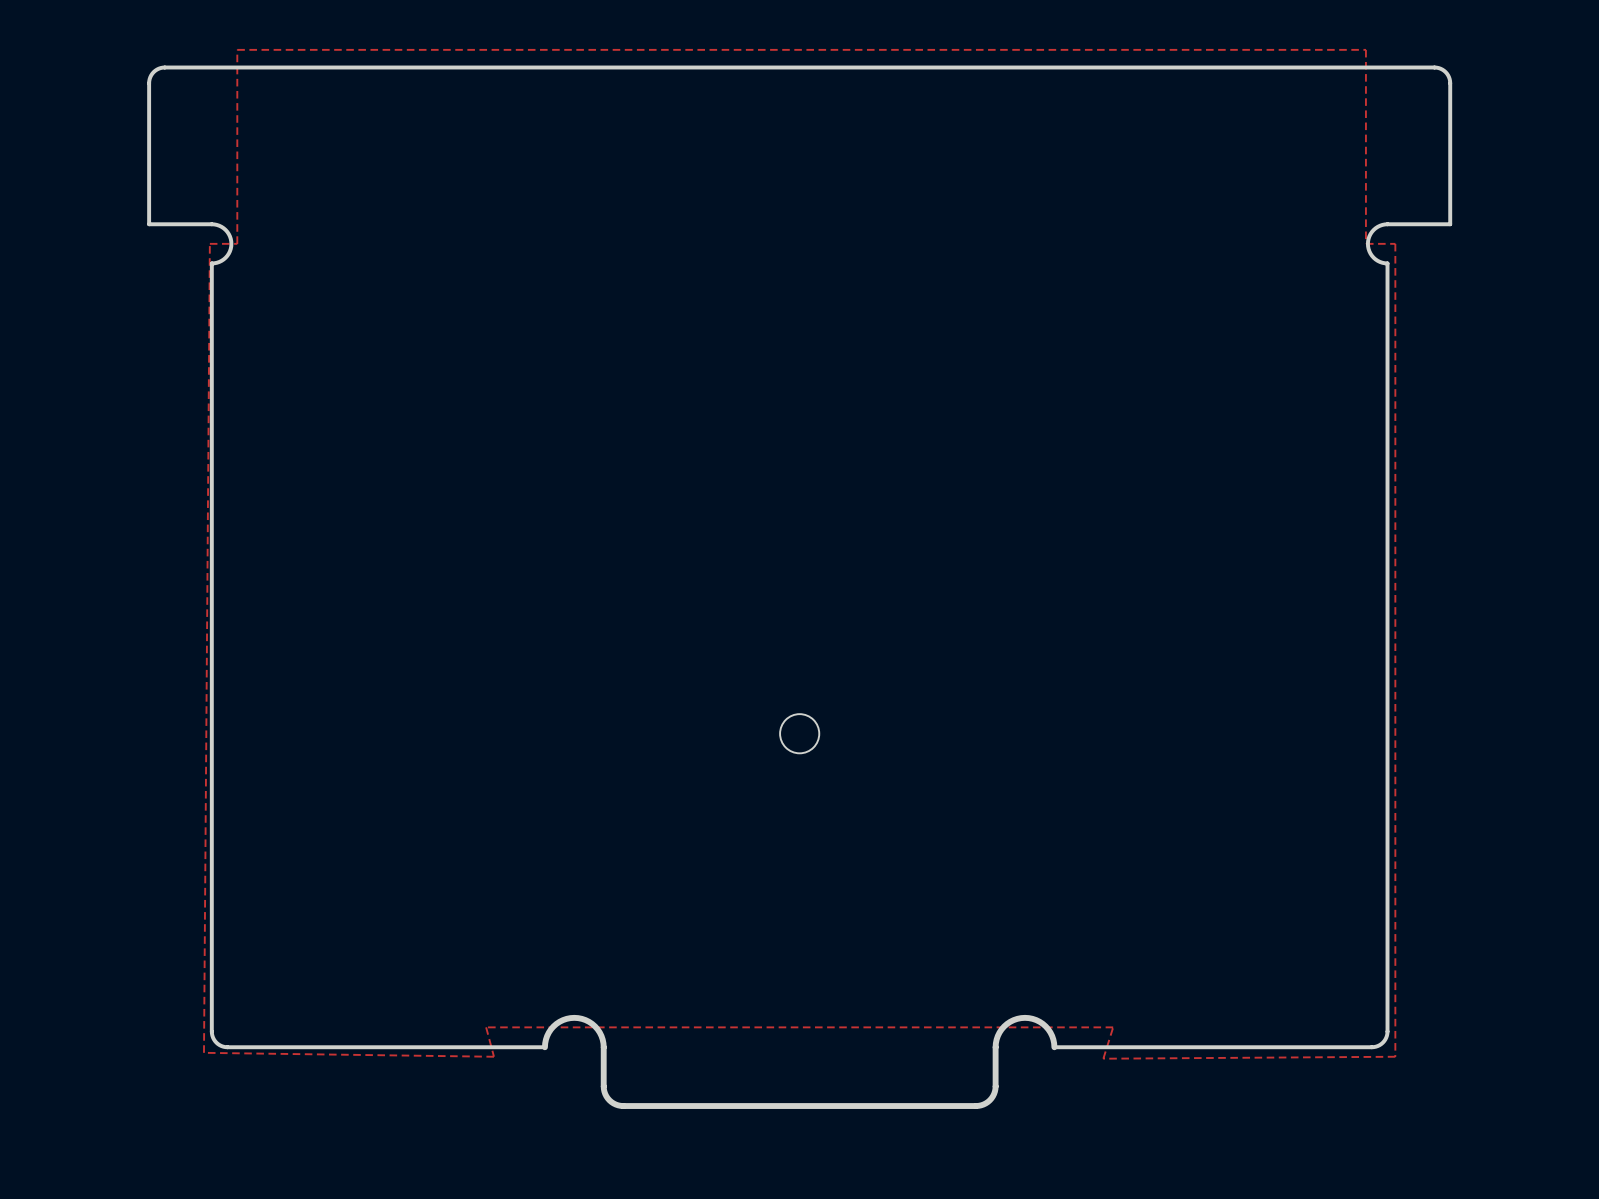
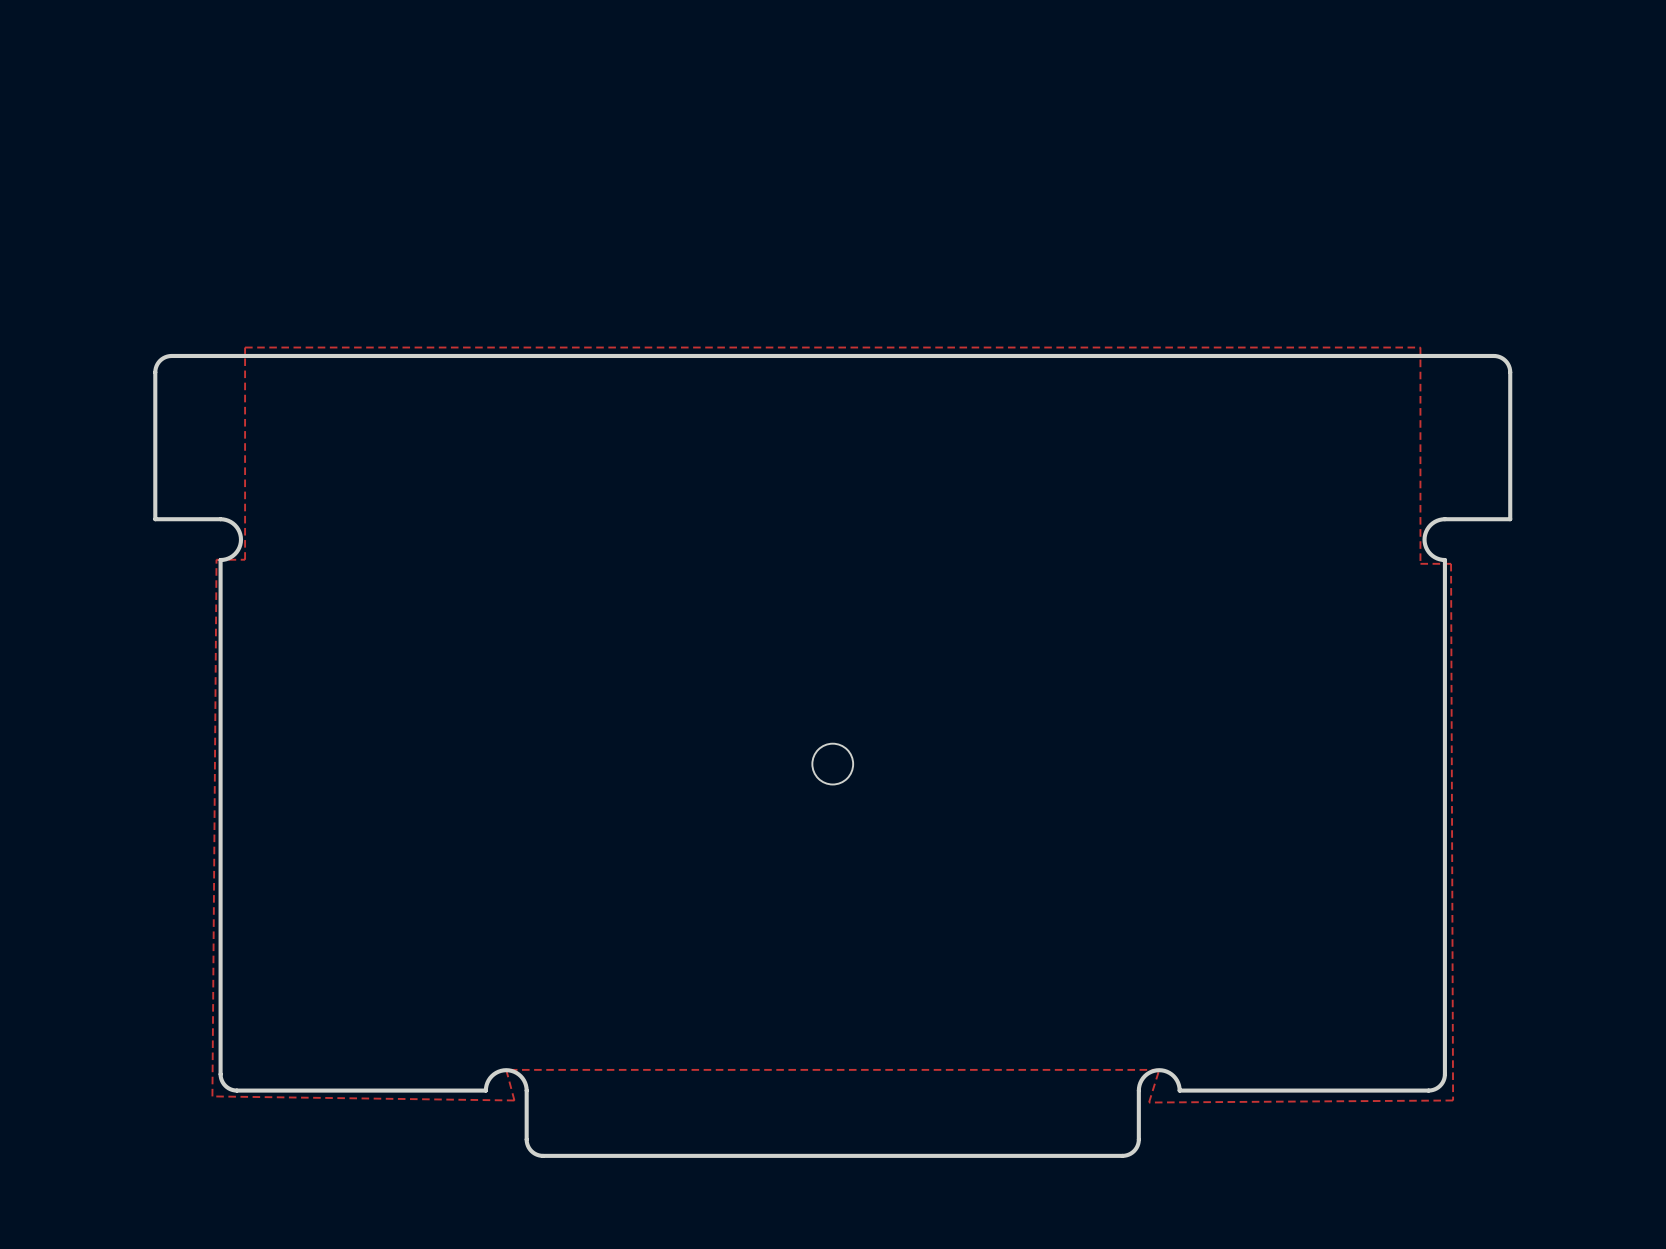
board edge: (211, 537) (211, 263) (225, 257) (230, 248) (231, 241) (225, 230) (216, 224) (149, 224) (149, 81) (153, 72) (162, 67) (1440, 68) (1446, 73) (1450, 83) (1450, 224) (1382, 224) (1373, 230) (1368, 241) (1368, 248) (1373, 257) (1387, 263) (1387, 537) -> (220, 560) (233, 555) (240, 544) (239, 531) (230, 521) (220, 519) (155, 519) (155, 370) (160, 360) (167, 356) (1498, 356) (1505, 360) (1510, 370) (1510, 519) (1444, 519) (1434, 521) (1426, 531) (1425, 544) (1432, 555) (1444, 560)
drawing: [541, 1014, 1058, 1109] -> none
board edge: (466, 1047) (544, 1047) -> (485, 1090) (490, 1078) (500, 1070) (511, 1070) (522, 1078) (526, 1087) (527, 1143) (533, 1152) (543, 1155) (1124, 1155) (1134, 1151) (1138, 1143) (1139, 1087) (1143, 1078) (1153, 1070) (1164, 1070) (1175, 1078) (1179, 1090)
board edge: (1054, 1047) (1132, 1047) -> none
zone outline: (203, 1052) (209, 243) (237, 243) (237, 49) (1365, 49) (1365, 243) (1395, 243) (1395, 1056) -> (212, 1096) (216, 559) (245, 559) (245, 347) (1420, 347) (1420, 563) (1451, 563) (1453, 1100)

